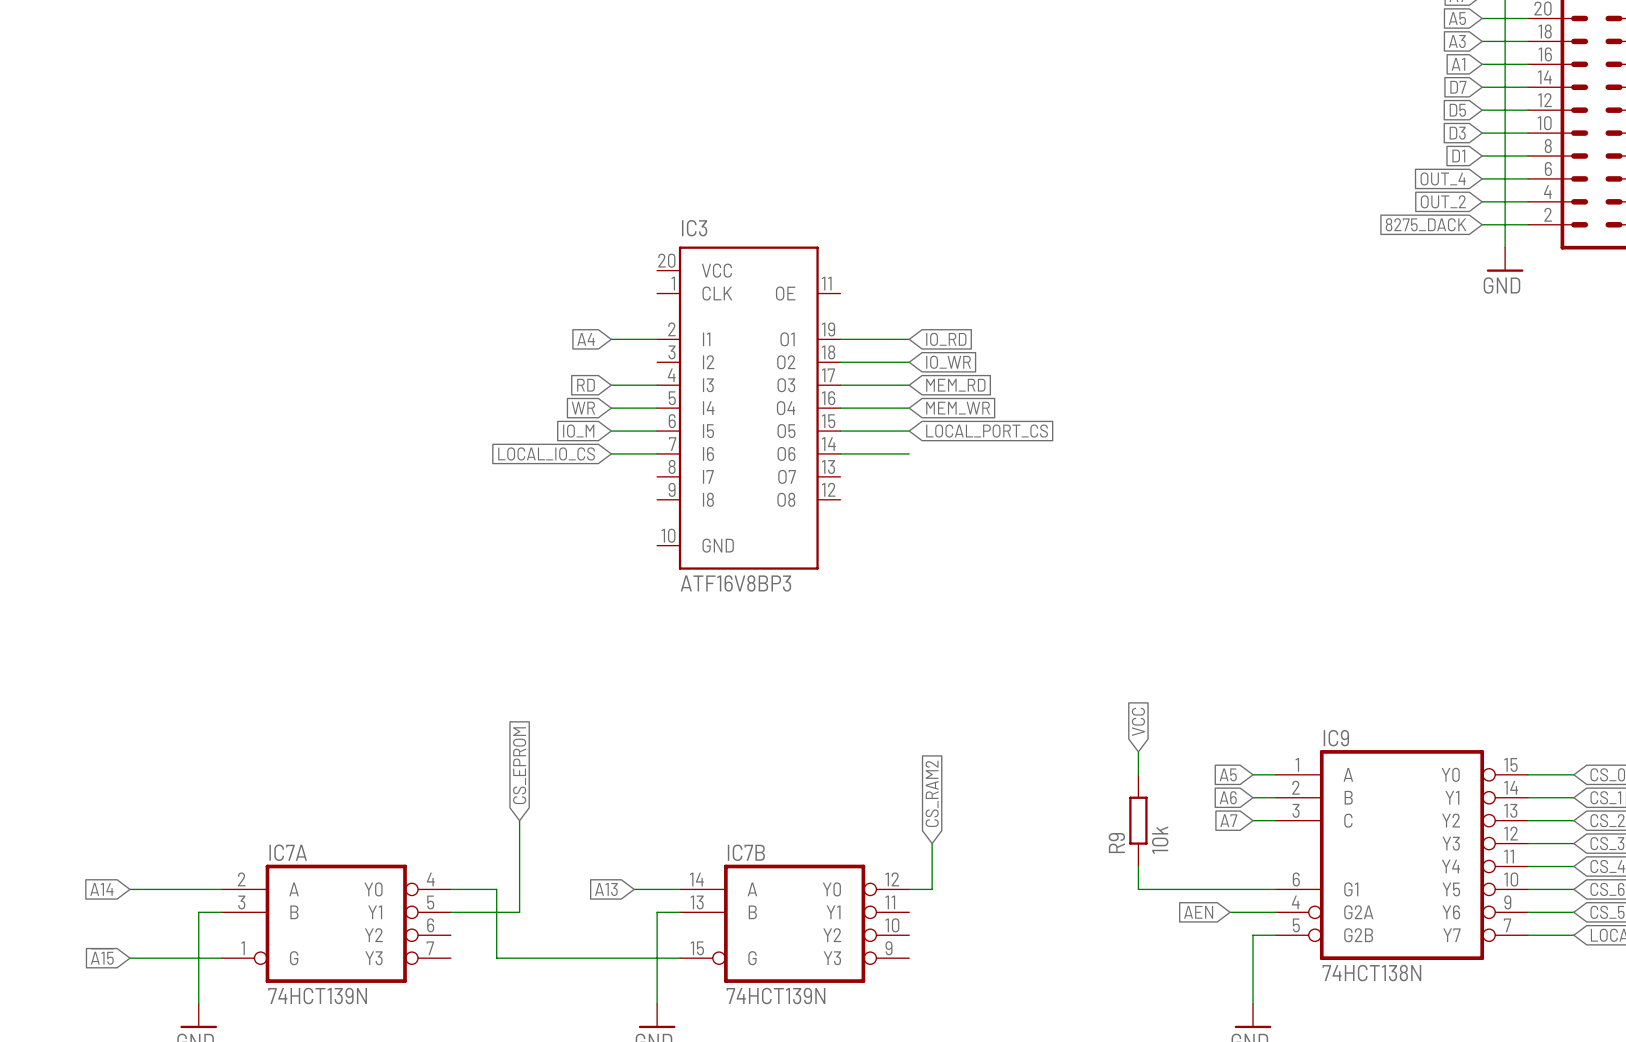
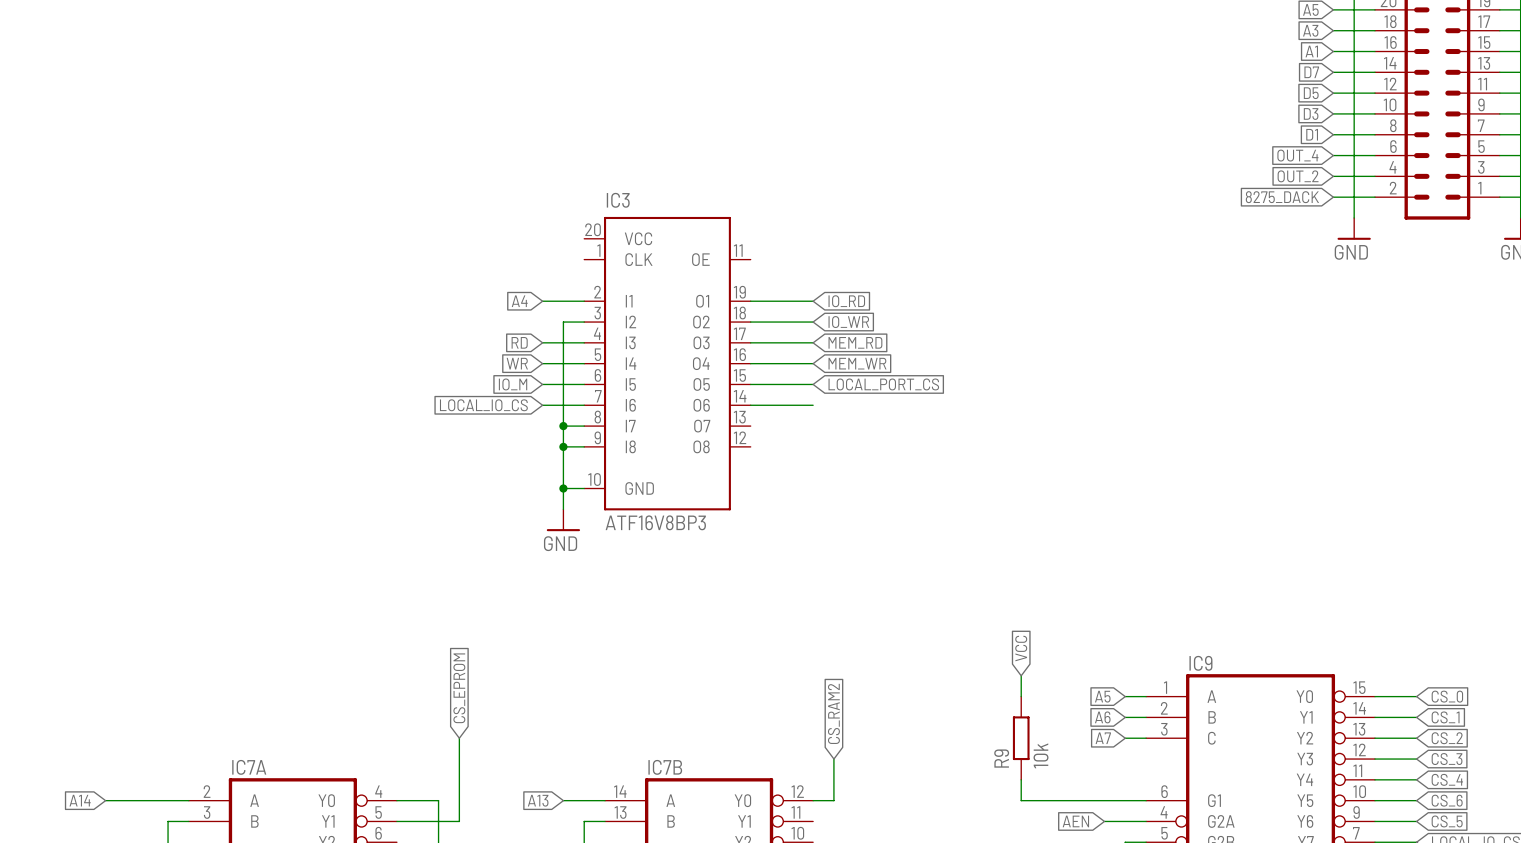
wire: none -> (584, 322) (563, 322) (563, 509)
wire: none -> (563, 426) (584, 426)
junction: none -> (563, 426)
wire: none -> (563, 446) (584, 446)
junction: none -> (563, 446)
wire: none -> (563, 488) (584, 488)
junction: none -> (563, 488)
power symbol: none -> GND (563, 520)

